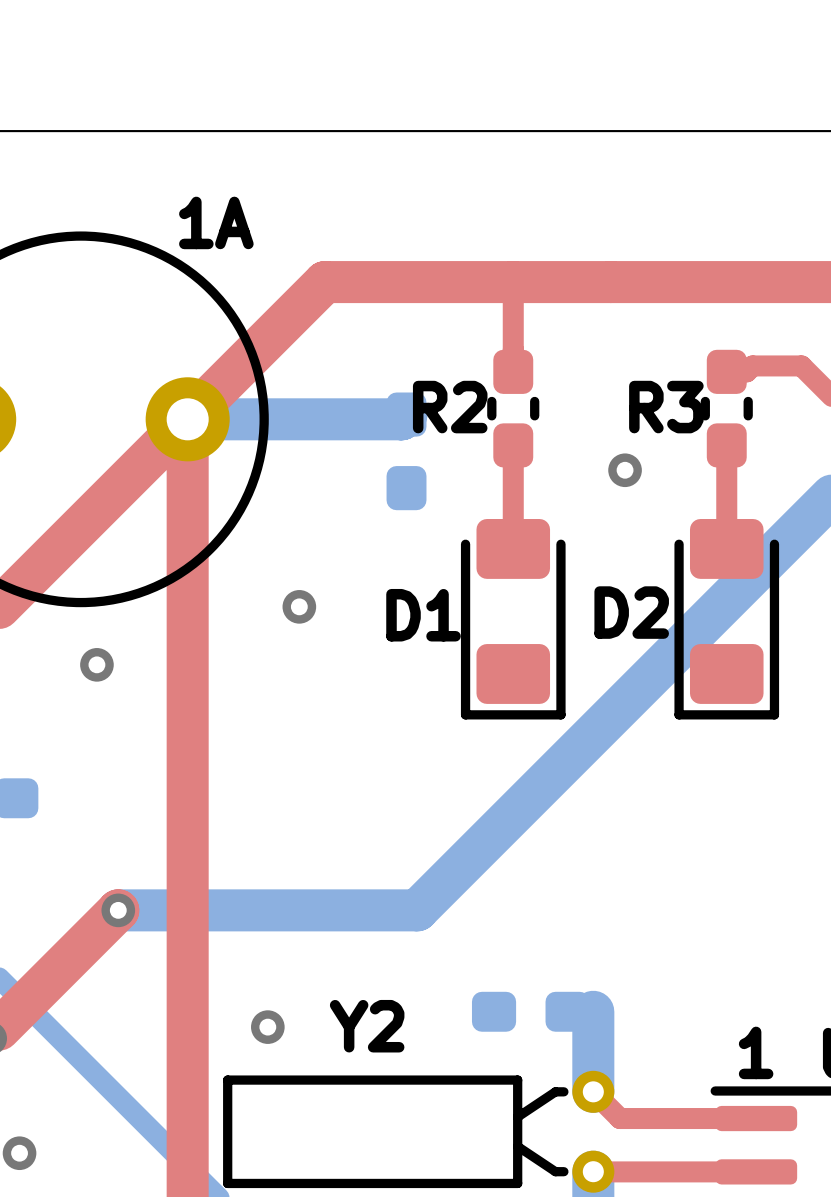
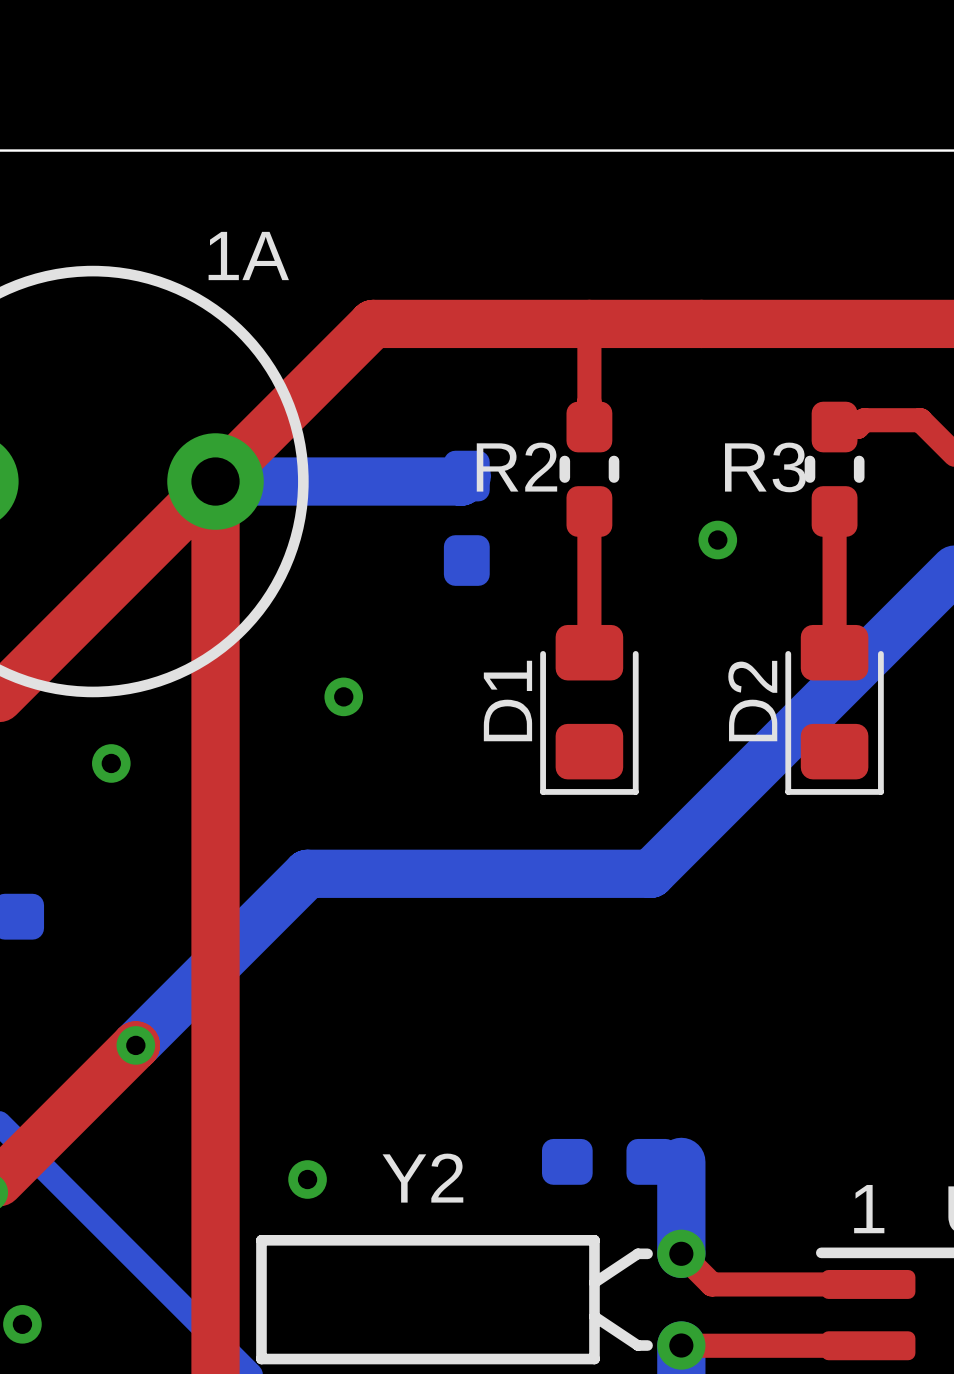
D1 footprint: [460, 519, 566, 720] -> [540, 624, 639, 795]
D2 footprint: [674, 519, 780, 720] -> [785, 624, 884, 795]
D2 name rotation: 0° (631, 612) -> 90° counterclockwise (752, 701)
D1 name rotation: 0° (423, 615) -> 90° counterclockwise (507, 701)
bottom track: (566, 760) (417, 910) (118, 910) -> (650, 873) (307, 873) (135, 1045)

